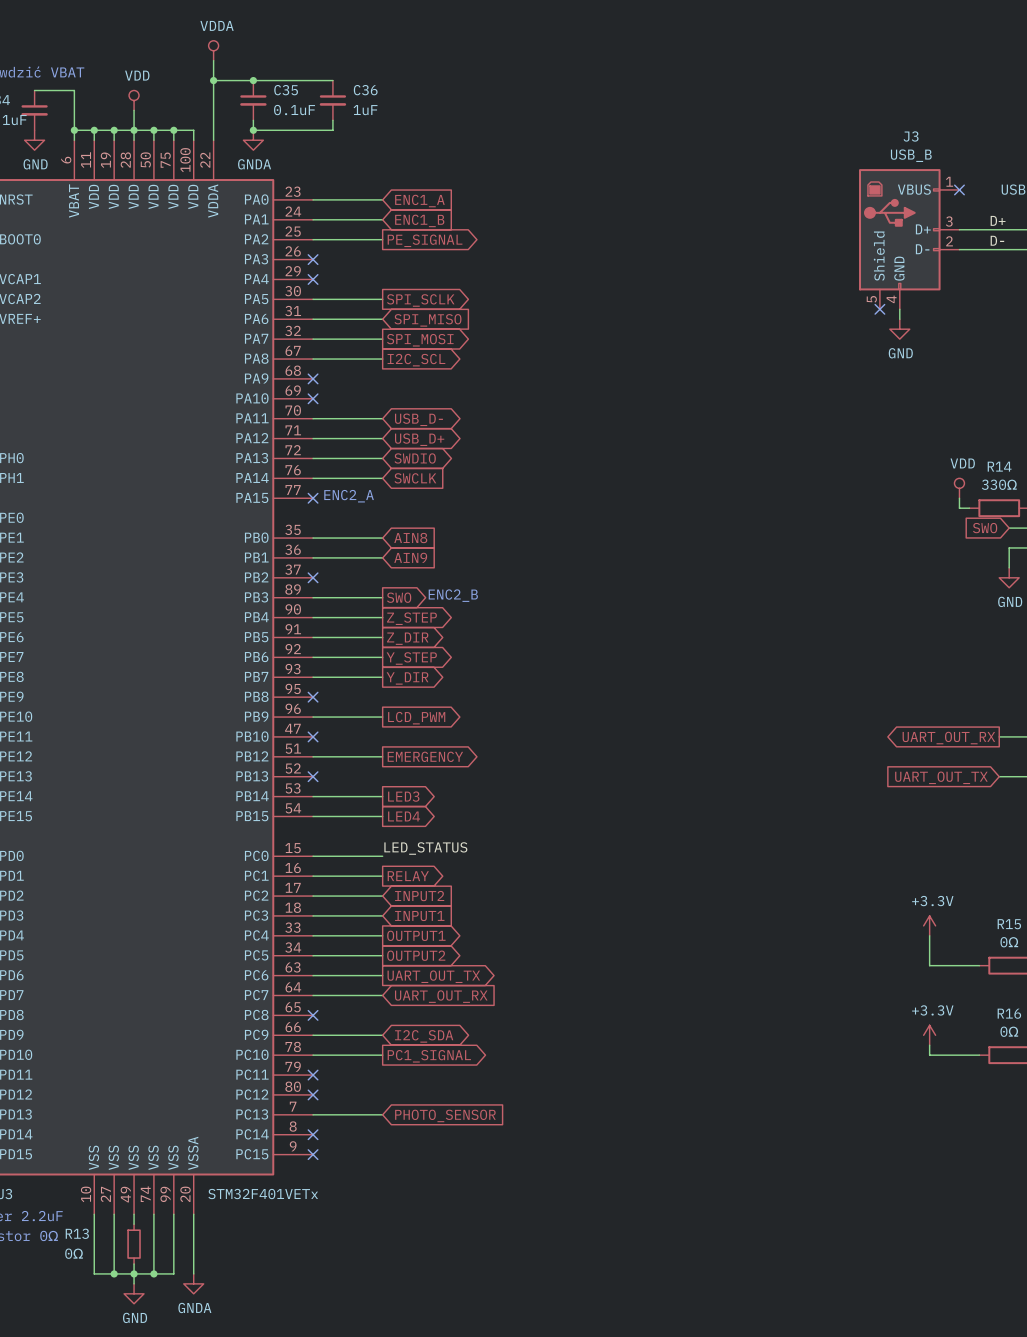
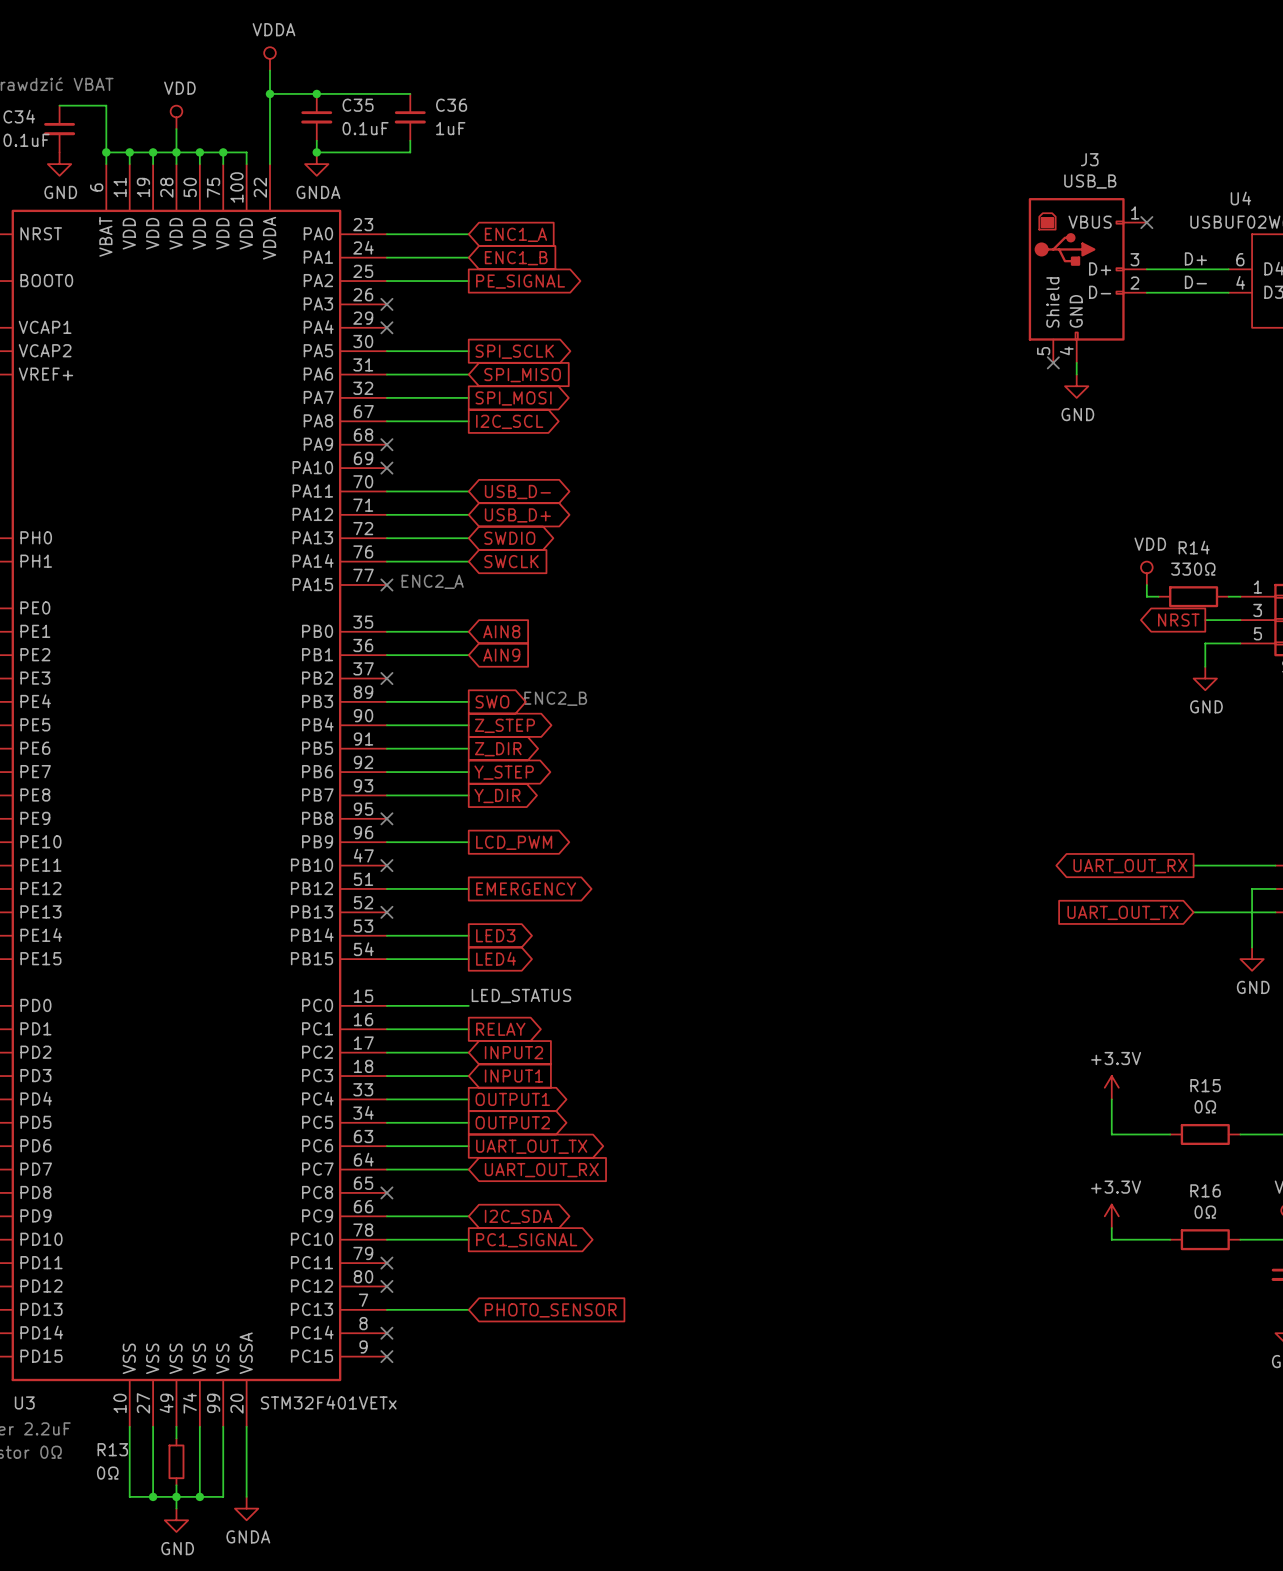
global label shape: input (985, 528) -> output (1178, 620)
global label: SWO (985, 528) -> NRST (1178, 620)

